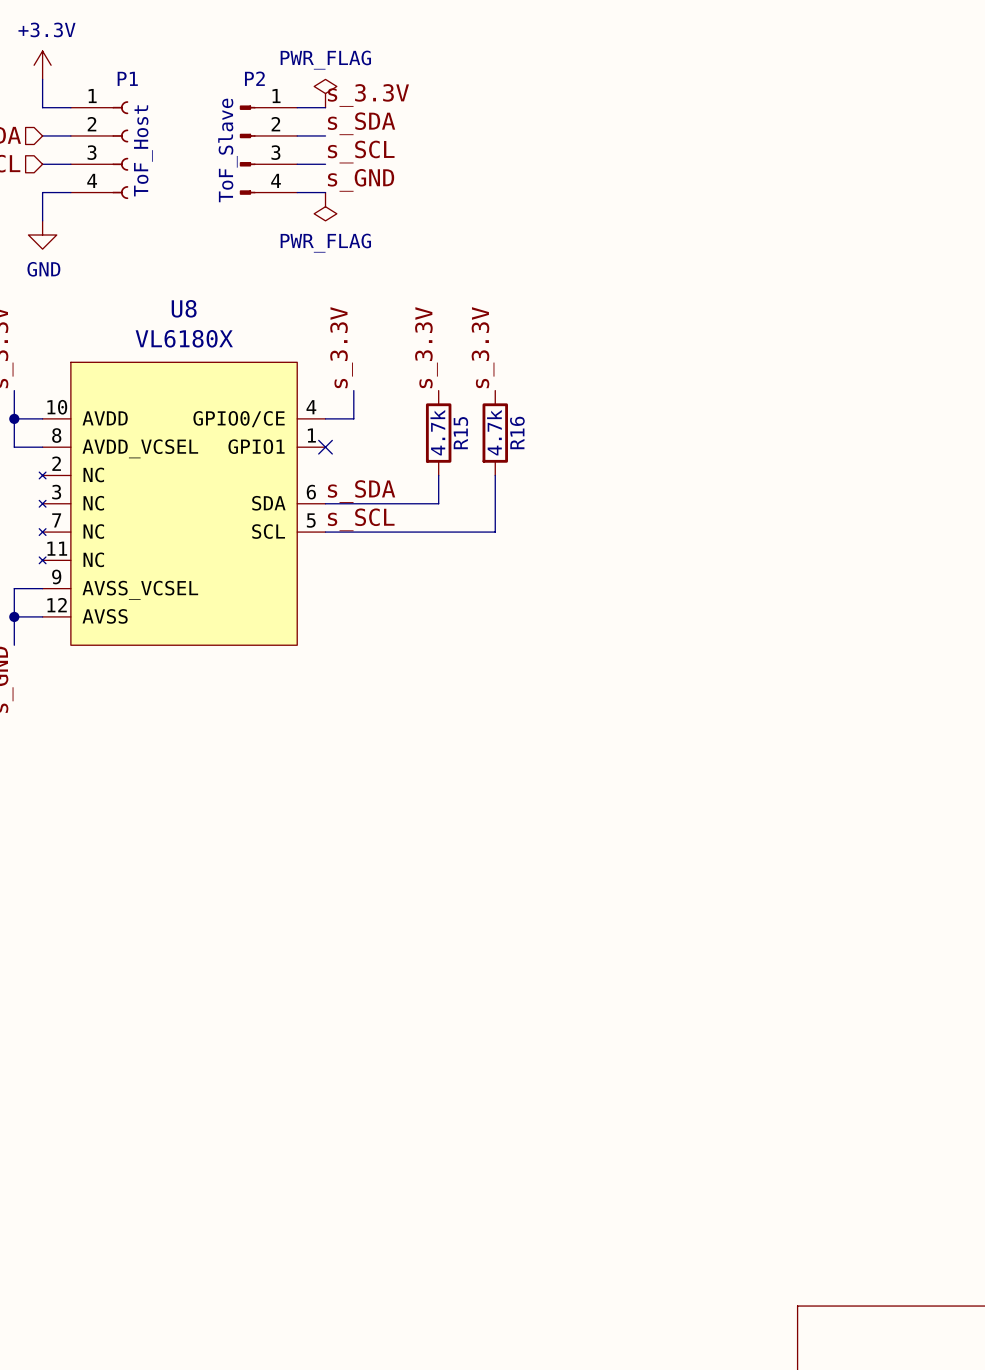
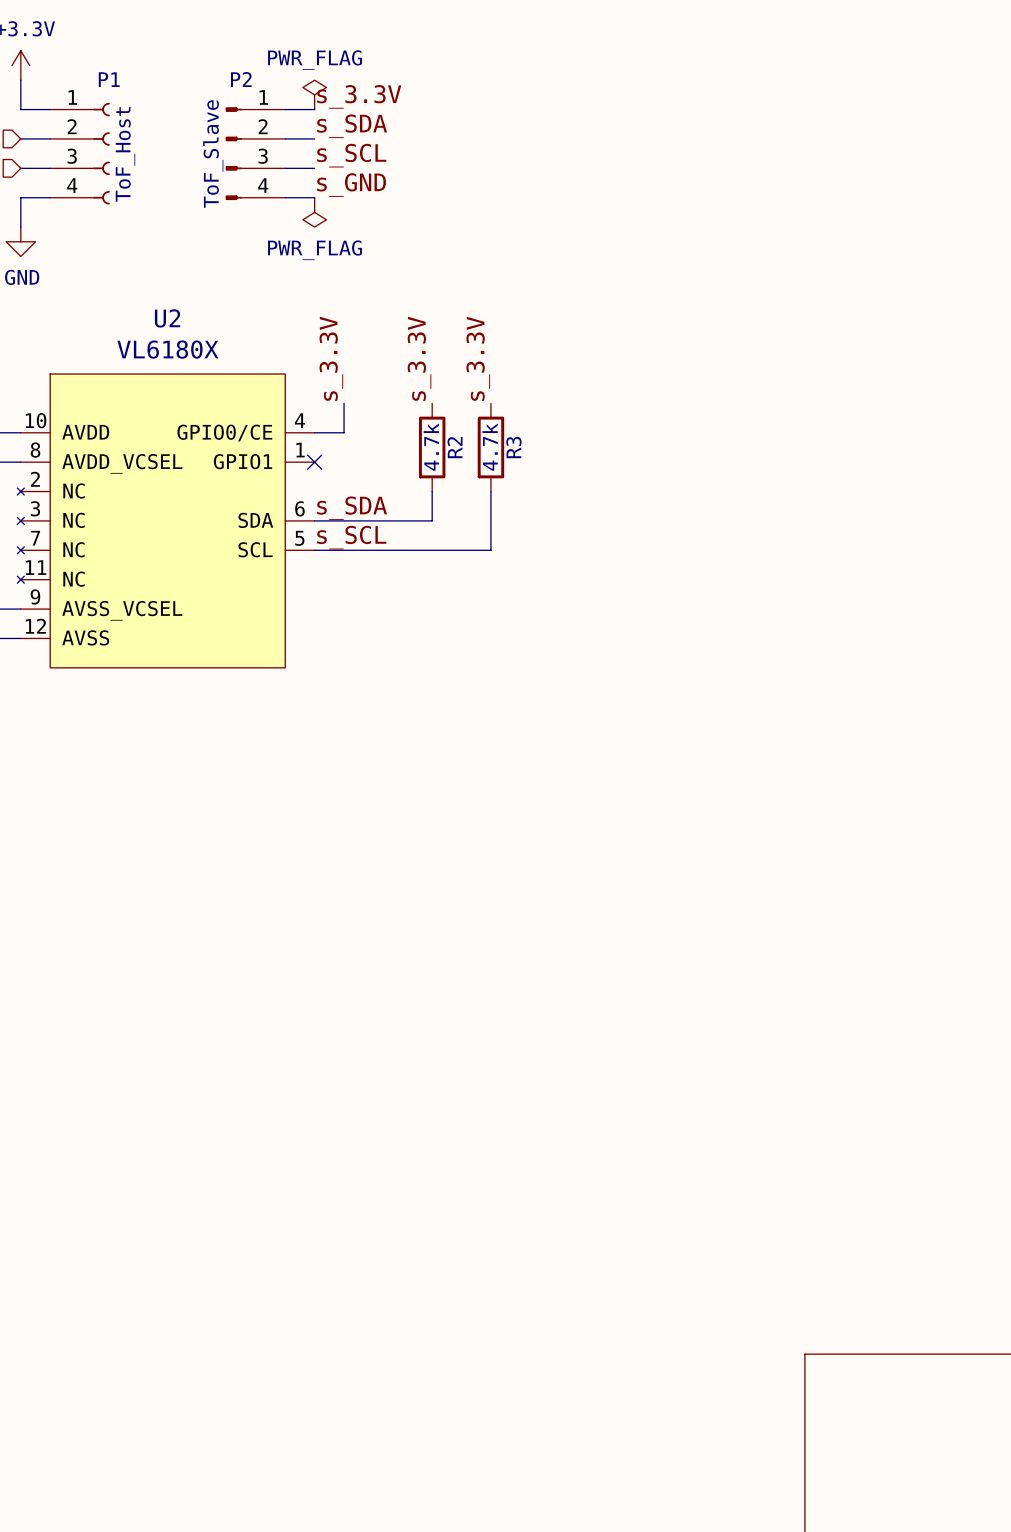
U8 name: U8 (184, 308) -> U2 (167, 318)
R16 name: R16 (517, 432) -> R3 (513, 447)
R15 name: R15 (460, 433) -> R2 (455, 447)

